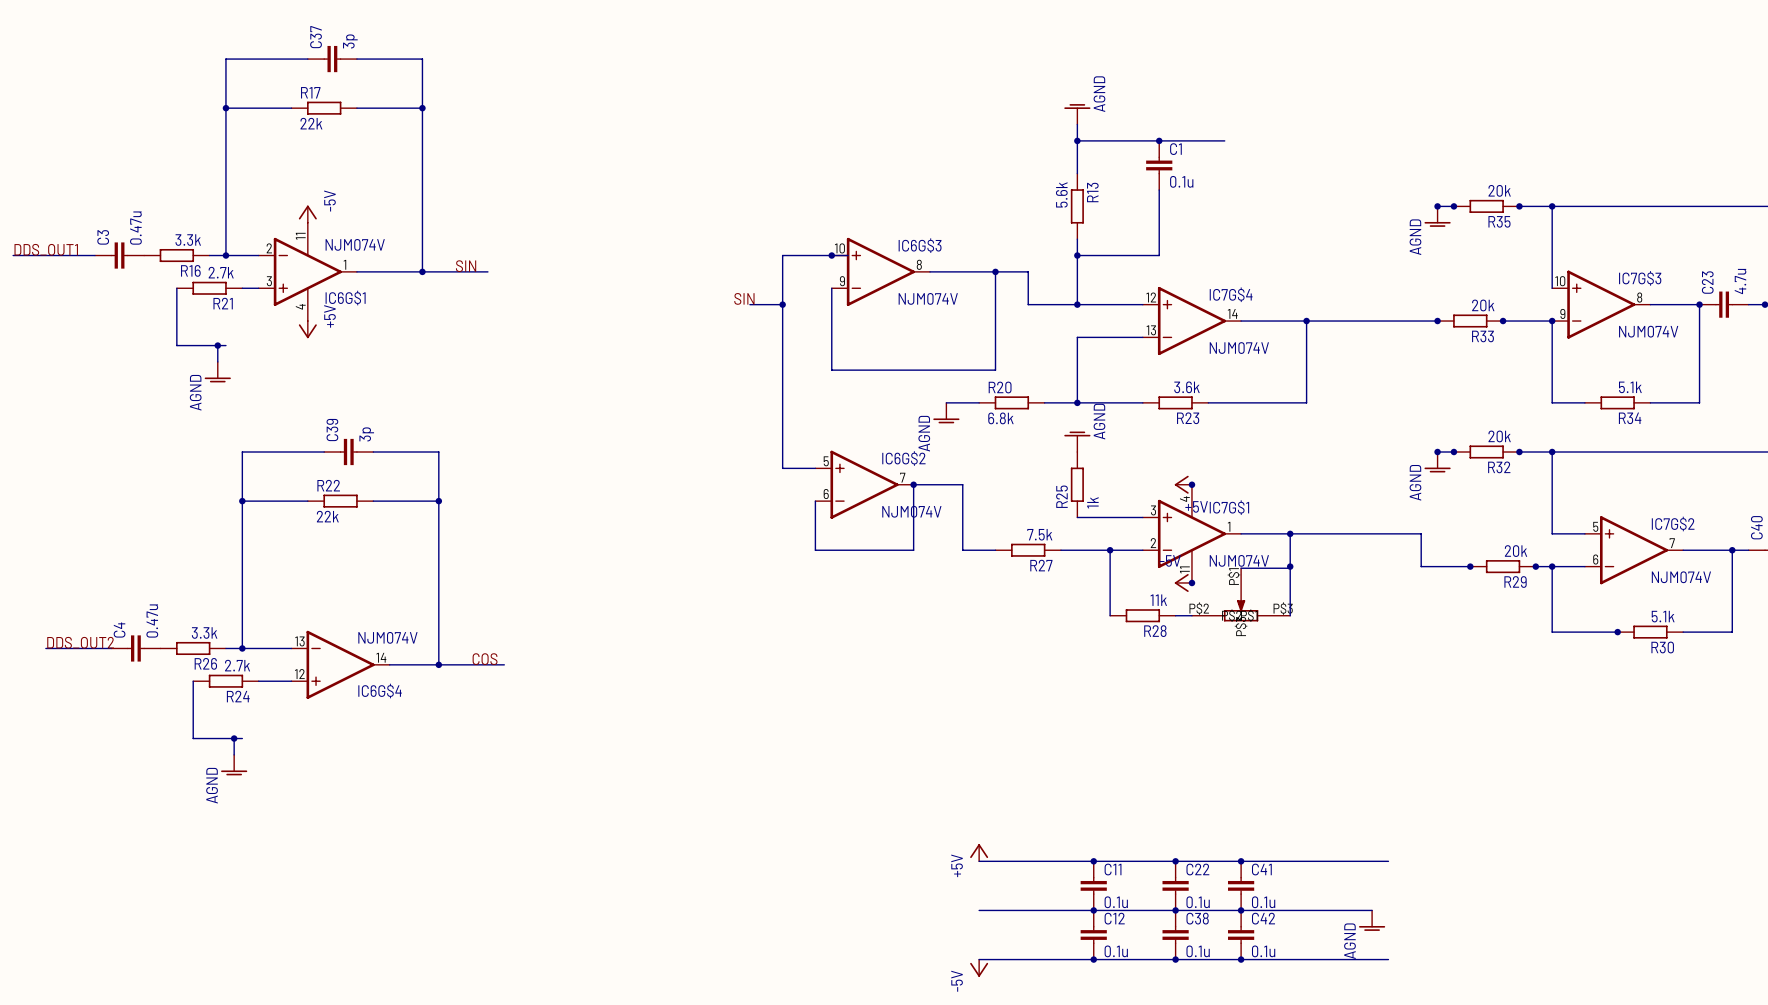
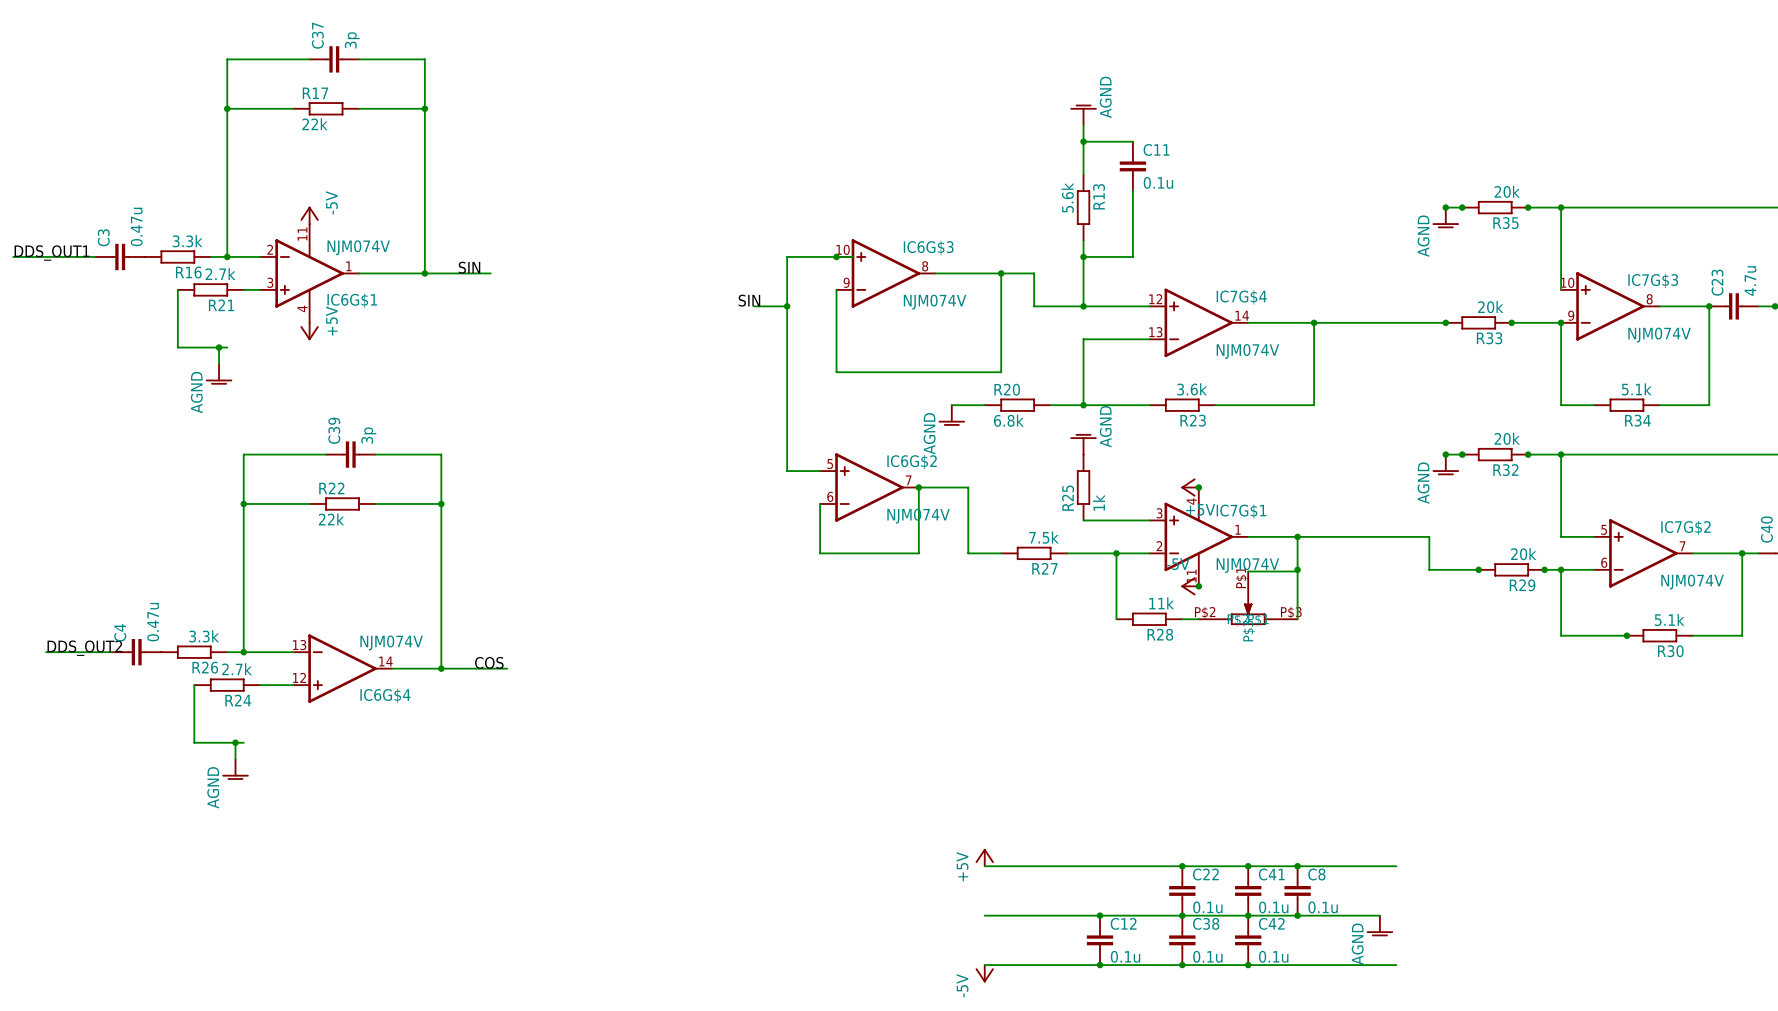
wire: (1126, 140) (1224, 140) -> none
junction: (1159, 140) -> none
C1: 0.1u (1159, 165) -> none
wire: (1159, 190) (1159, 255) (1126, 255) -> (1132, 191) (1132, 256)
junction: (1093, 861) -> none
junction: none -> (1297, 866)
C11 position: (1093, 885) -> (1132, 166)
C8: none -> 0.1u (1297, 890)
junction: none -> (1297, 915)

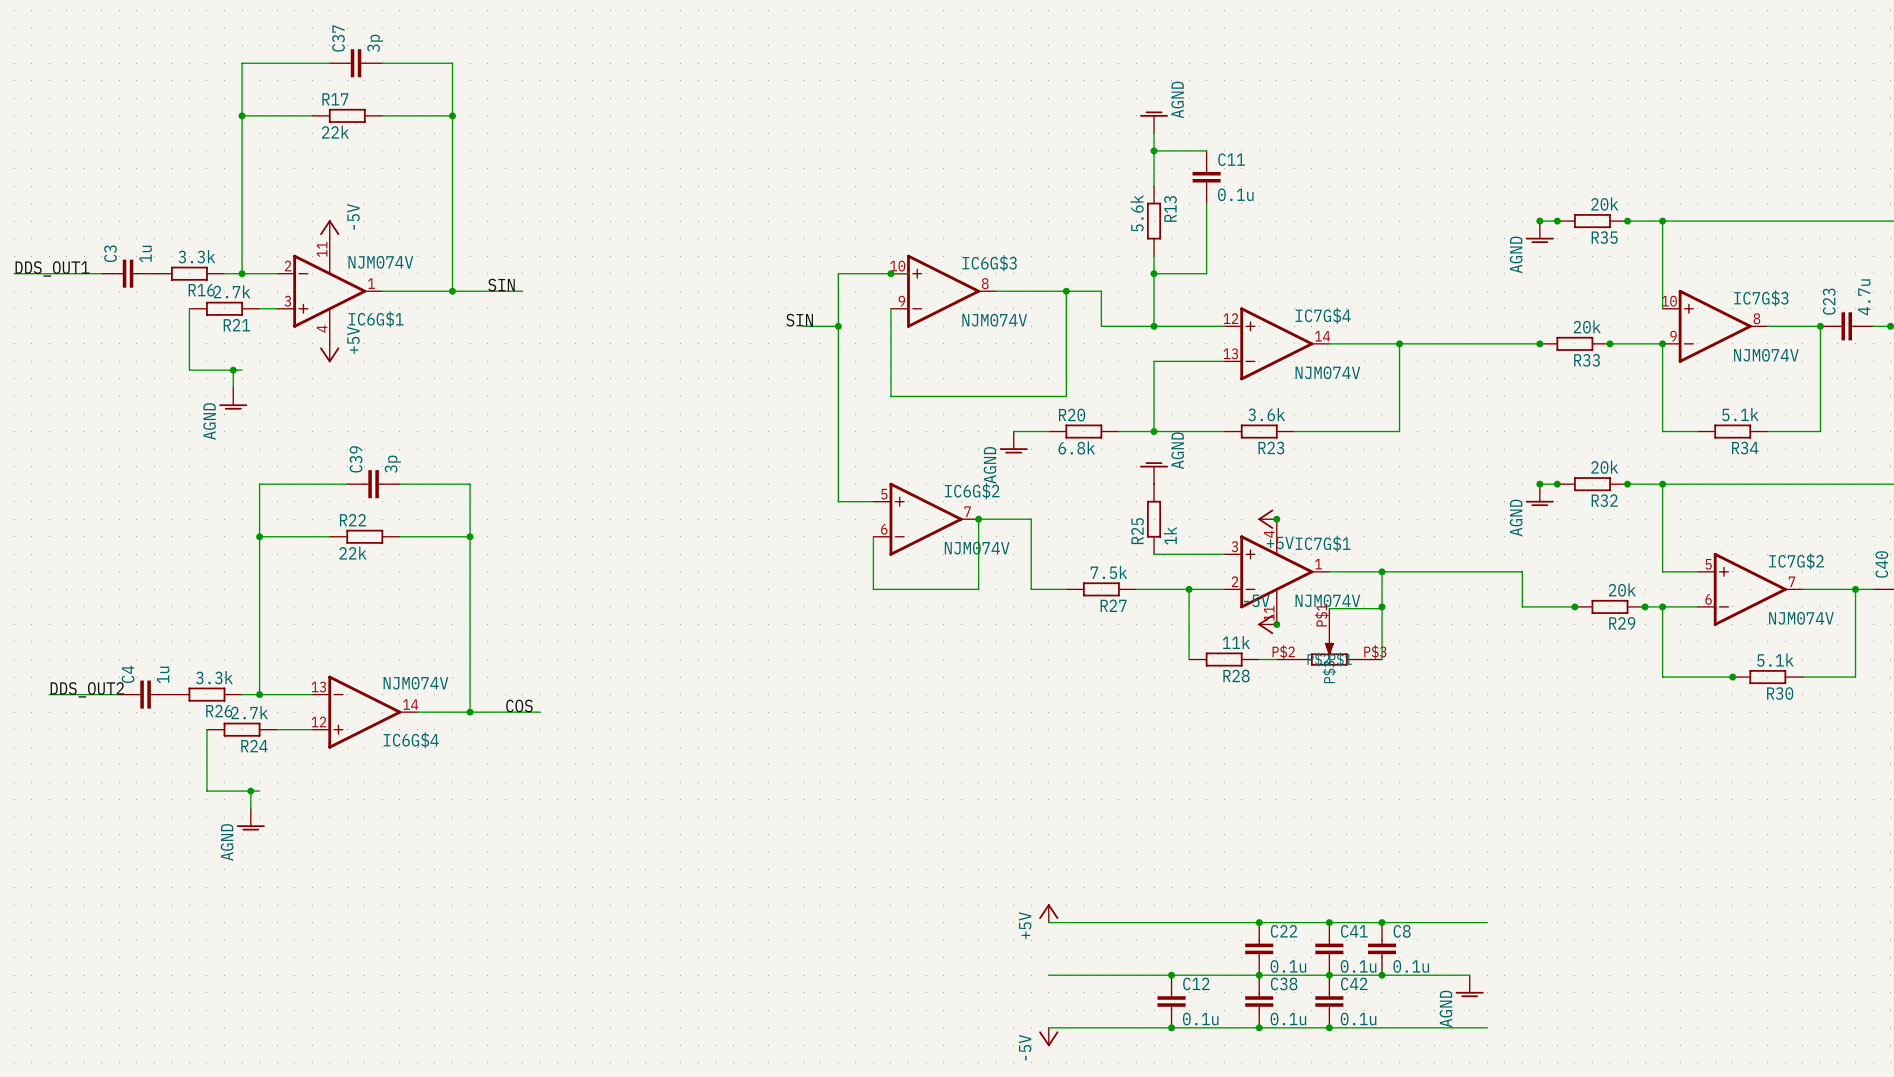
C3 value: 0.47u (136, 226) -> 1u (145, 254)
C4 value: 0.47u (153, 622) -> 1u (163, 674)

